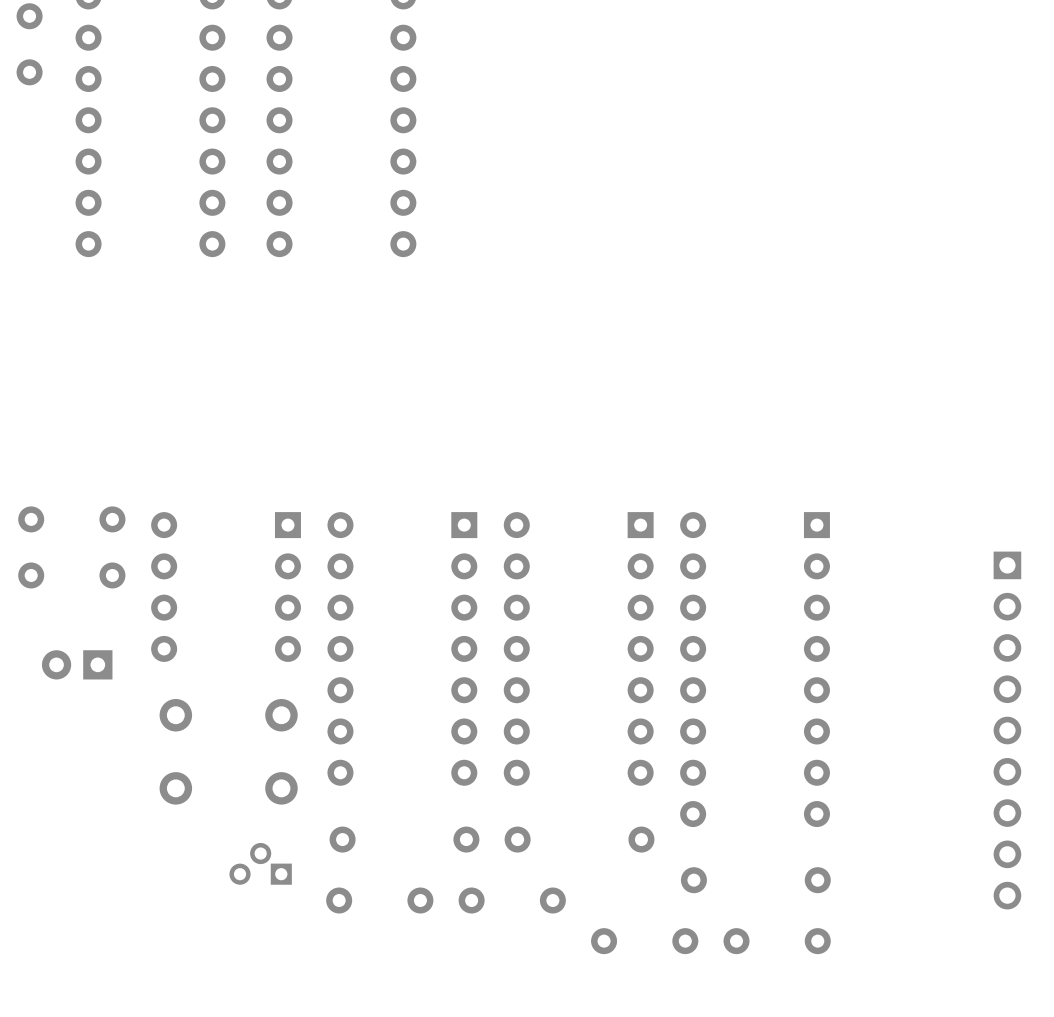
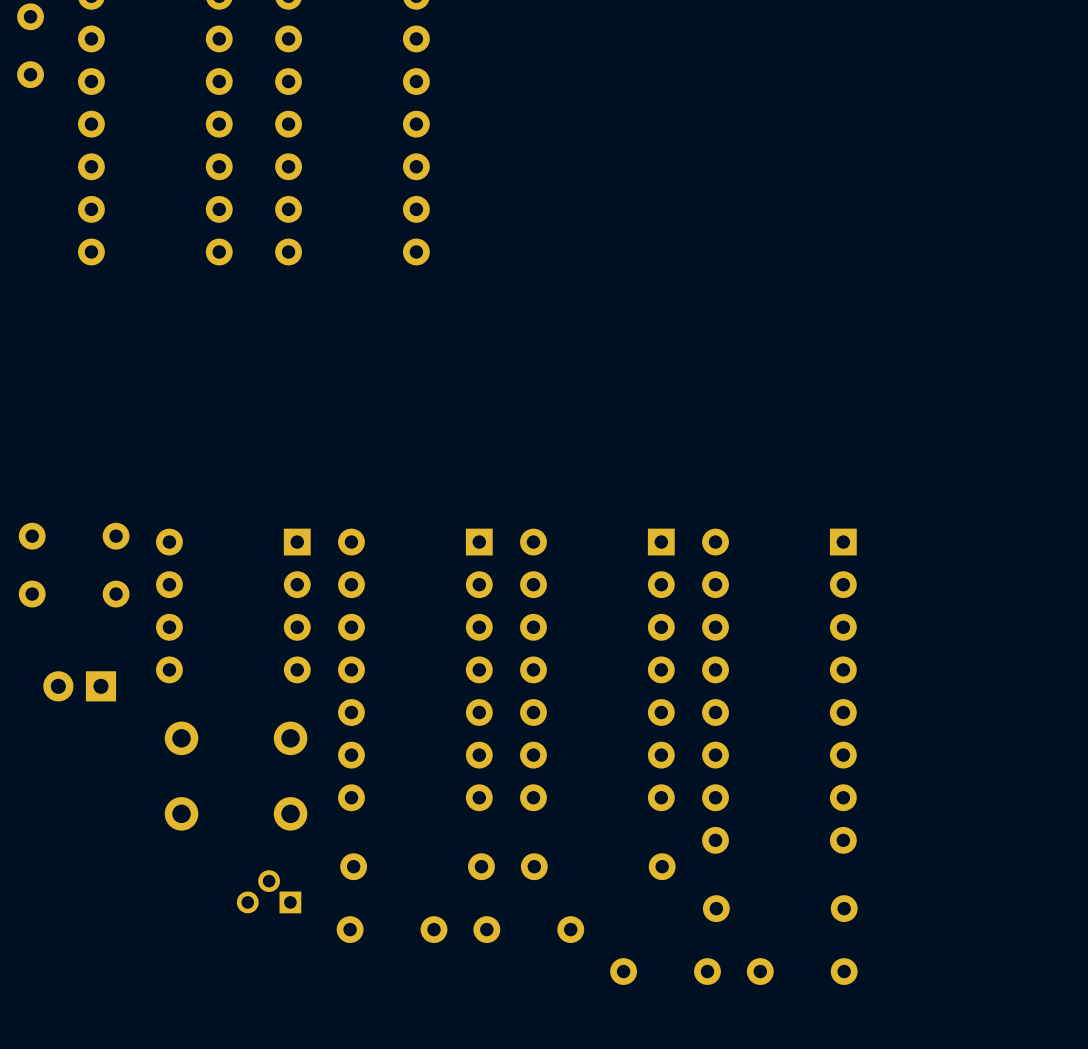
part: (1007, 730) -> none

